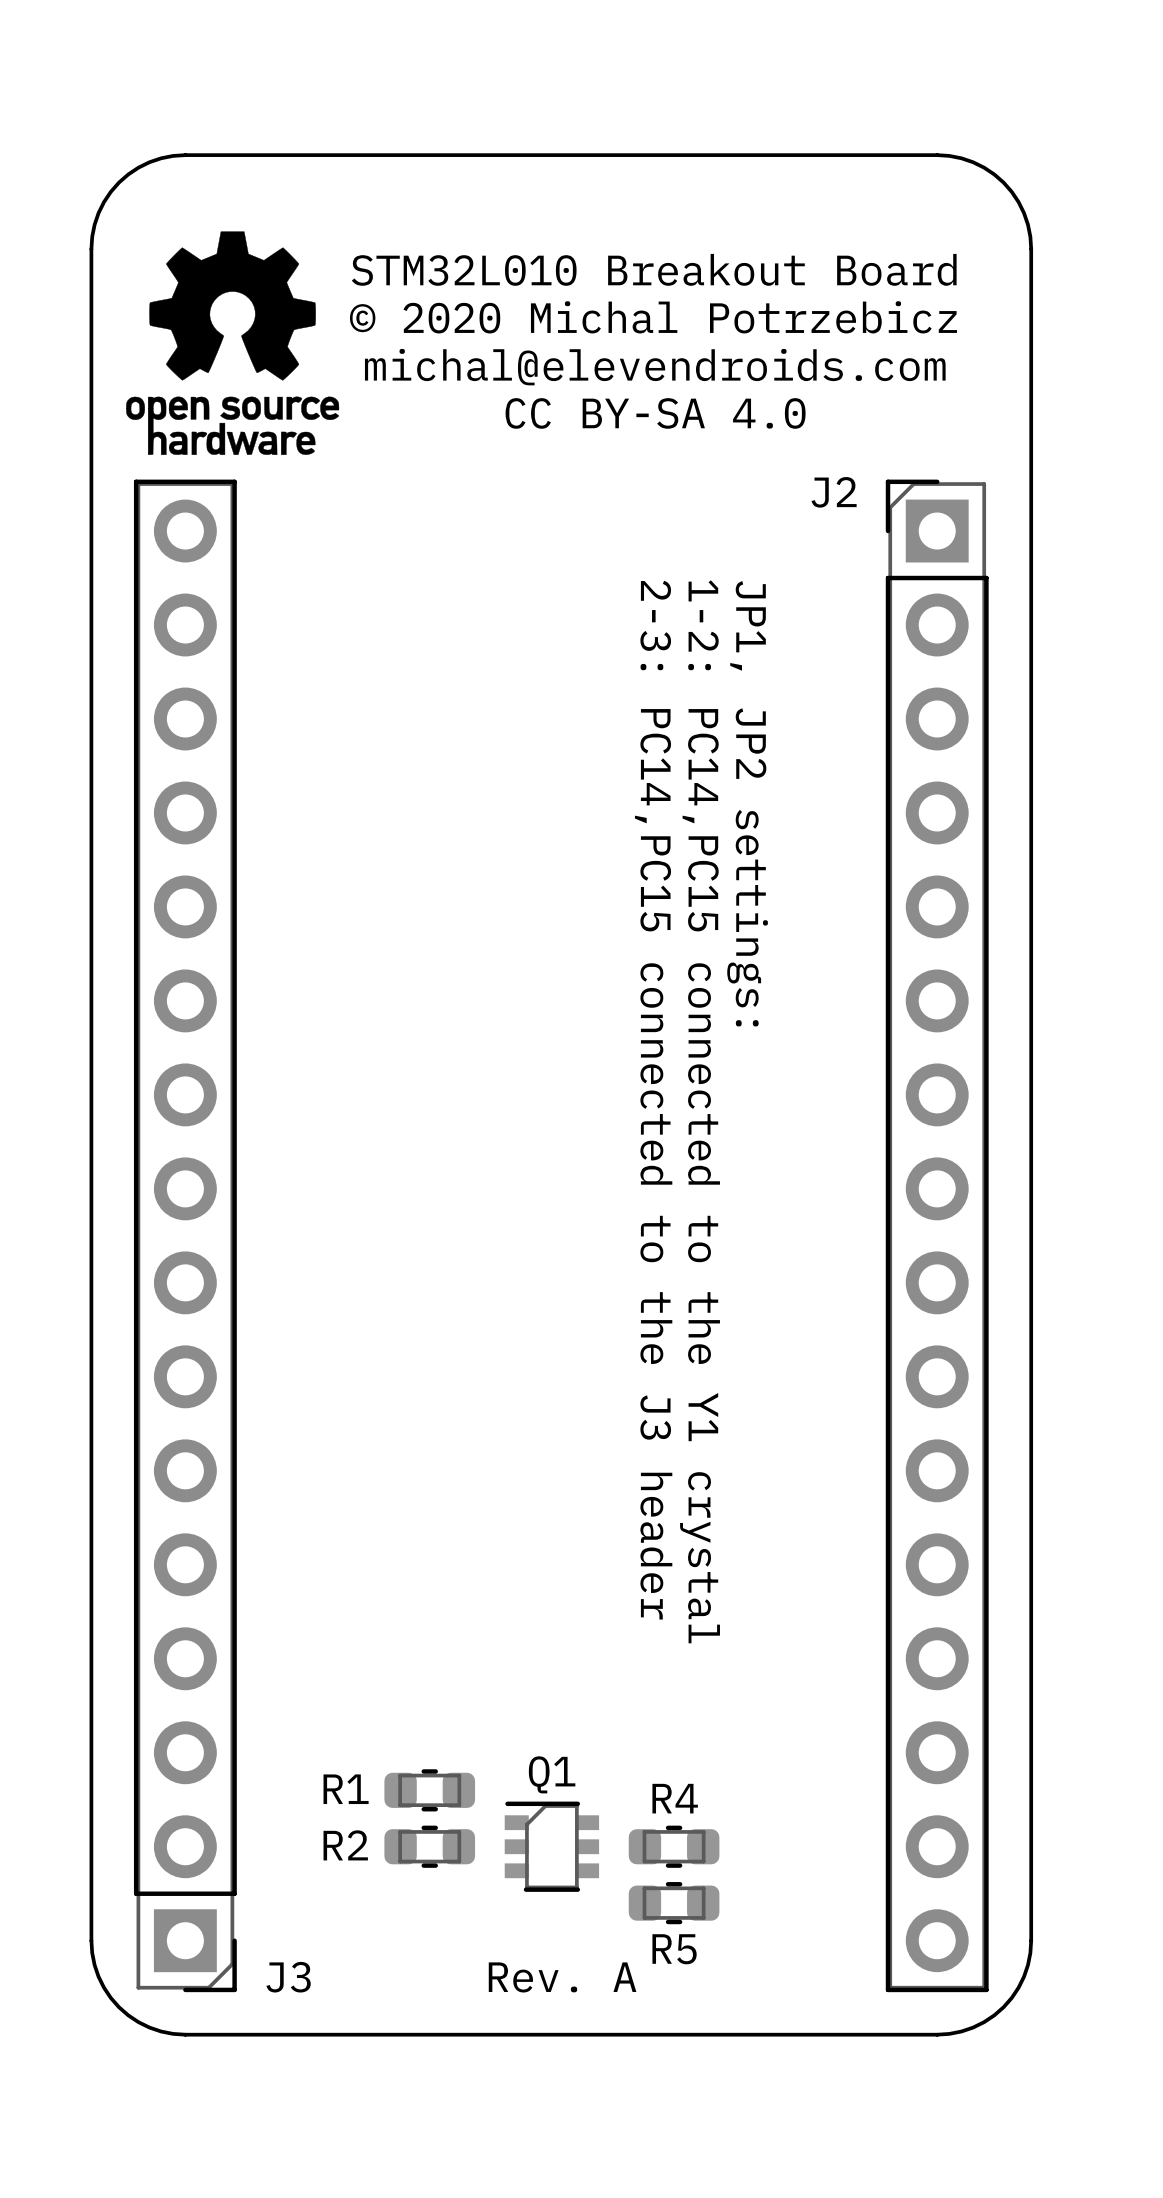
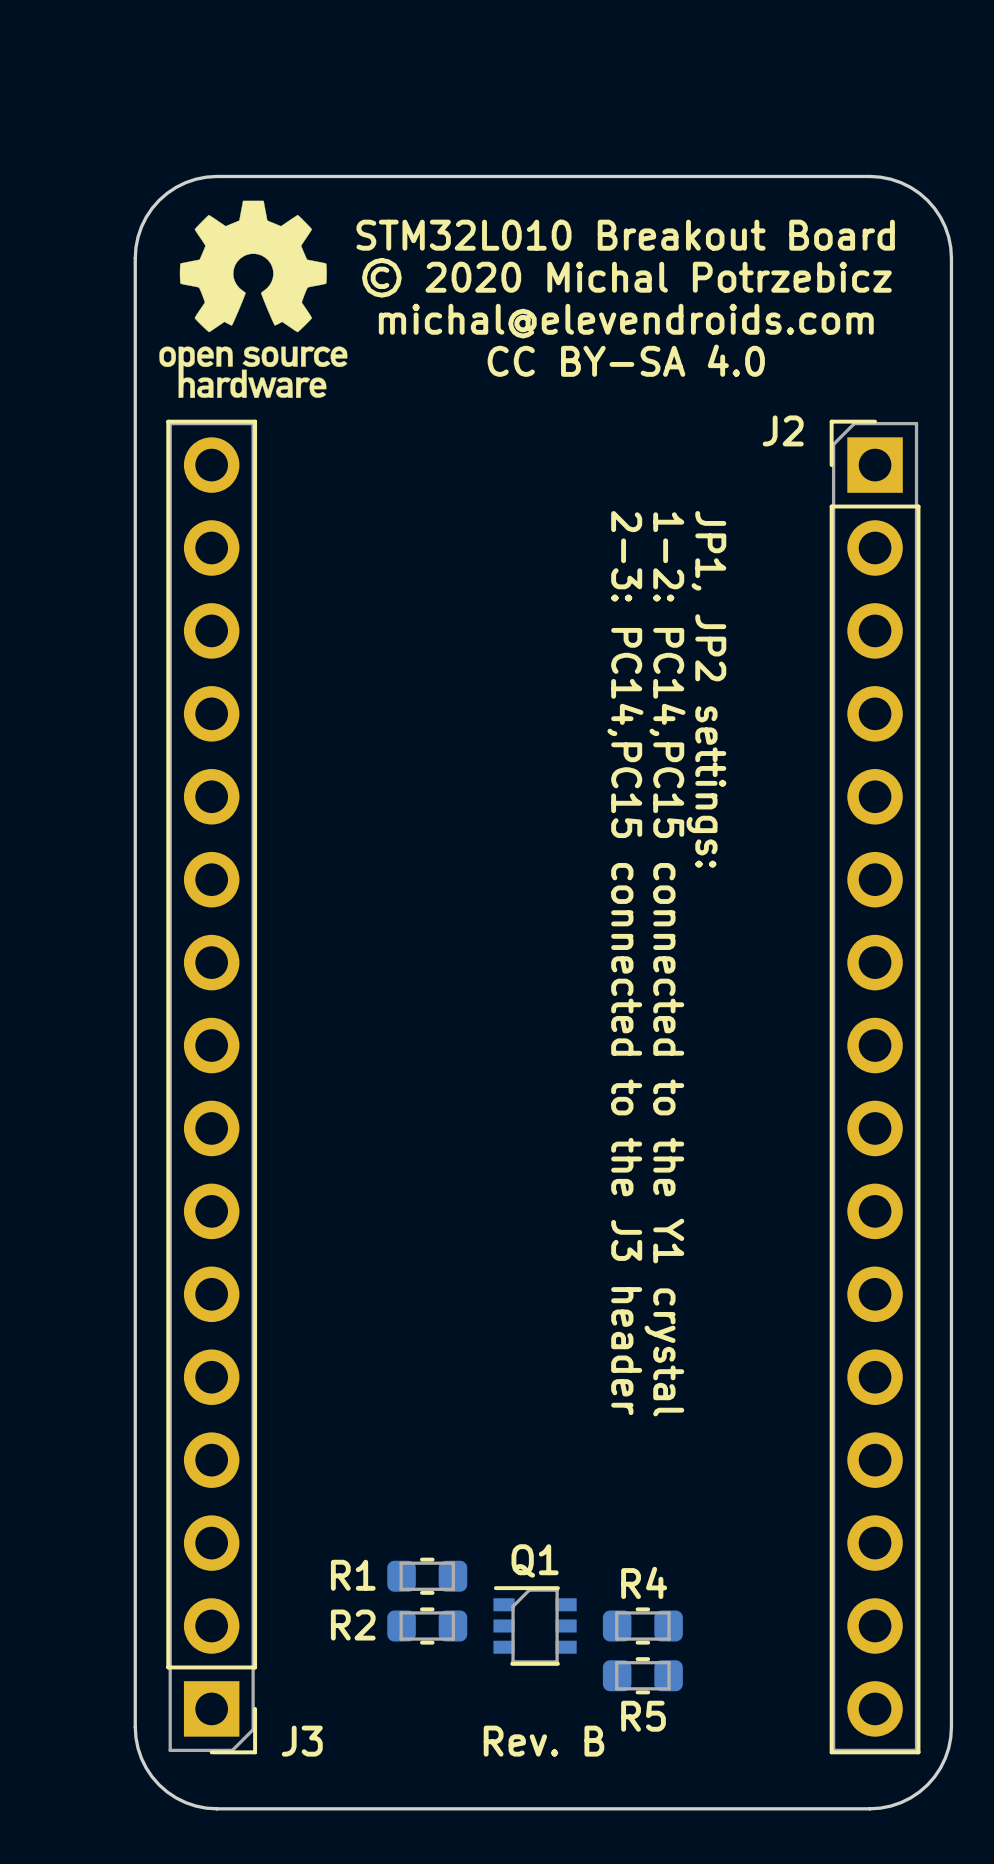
board edge: (937, 155) (173, 155) (149, 162) (128, 174) (110, 191) (98, 213) (92, 236) (91, 249) (91, 1940) (94, 1965) (98, 1976) (110, 1997) (128, 2015) (149, 2027) (161, 2031) (185, 2034) (937, 2034) (961, 2031) (984, 2022) (994, 2015) (1011, 1997) (1024, 1976) (1027, 1965) (1031, 1940) (1031, 249) (1027, 224) (1024, 213) (1018, 202) (1003, 182) (994, 174) (973, 162) (961, 158) (937, 155) -> (869, 176) (901, 182) (927, 200) (945, 226) (951, 258) (951, 1727) (945, 1758) (927, 1784) (910, 1797) (890, 1806) (869, 1808) (216, 1808) (185, 1802) (159, 1784) (146, 1768) (138, 1748) (135, 1727) (135, 258) (141, 226) (152, 208) (167, 193) (185, 182) (206, 177) (869, 176)
text: Rev. A (562, 1977) -> Rev. B (543, 1741)

